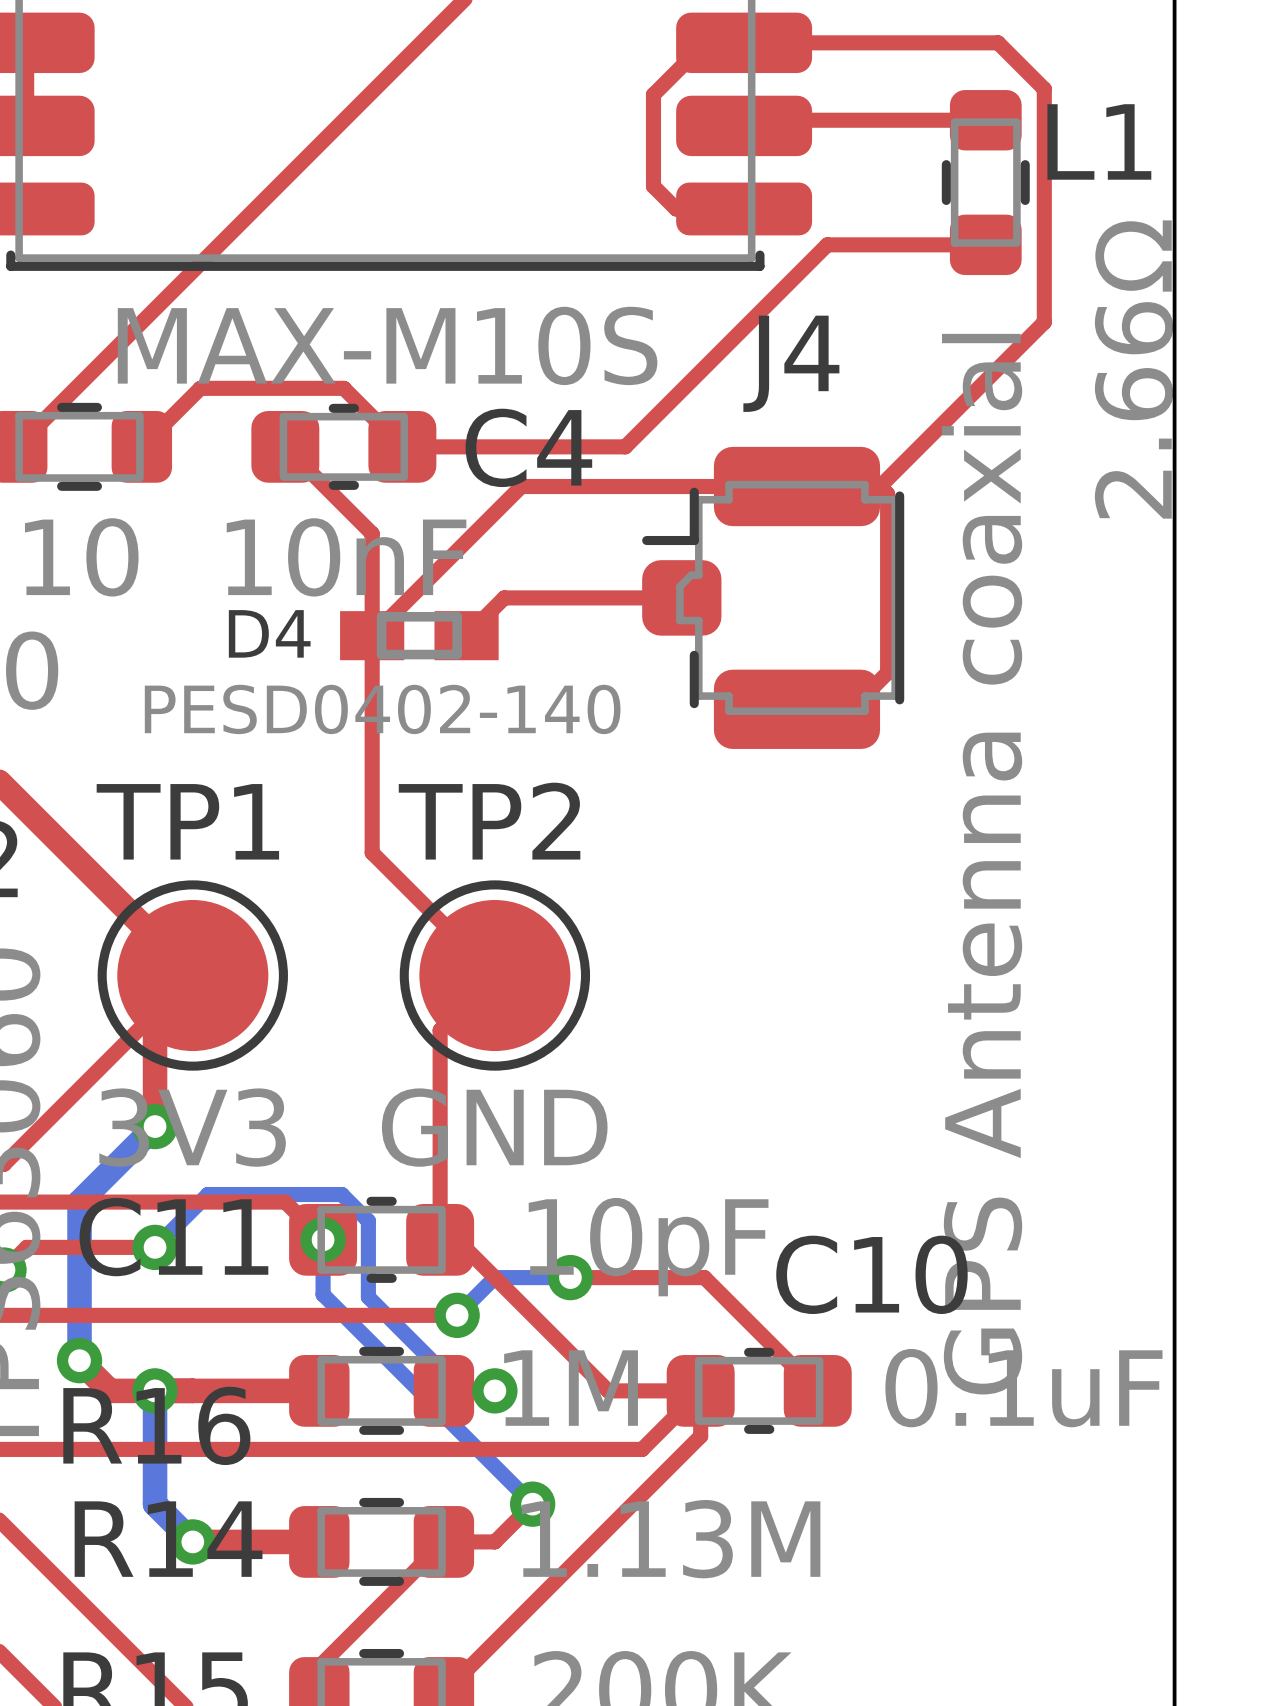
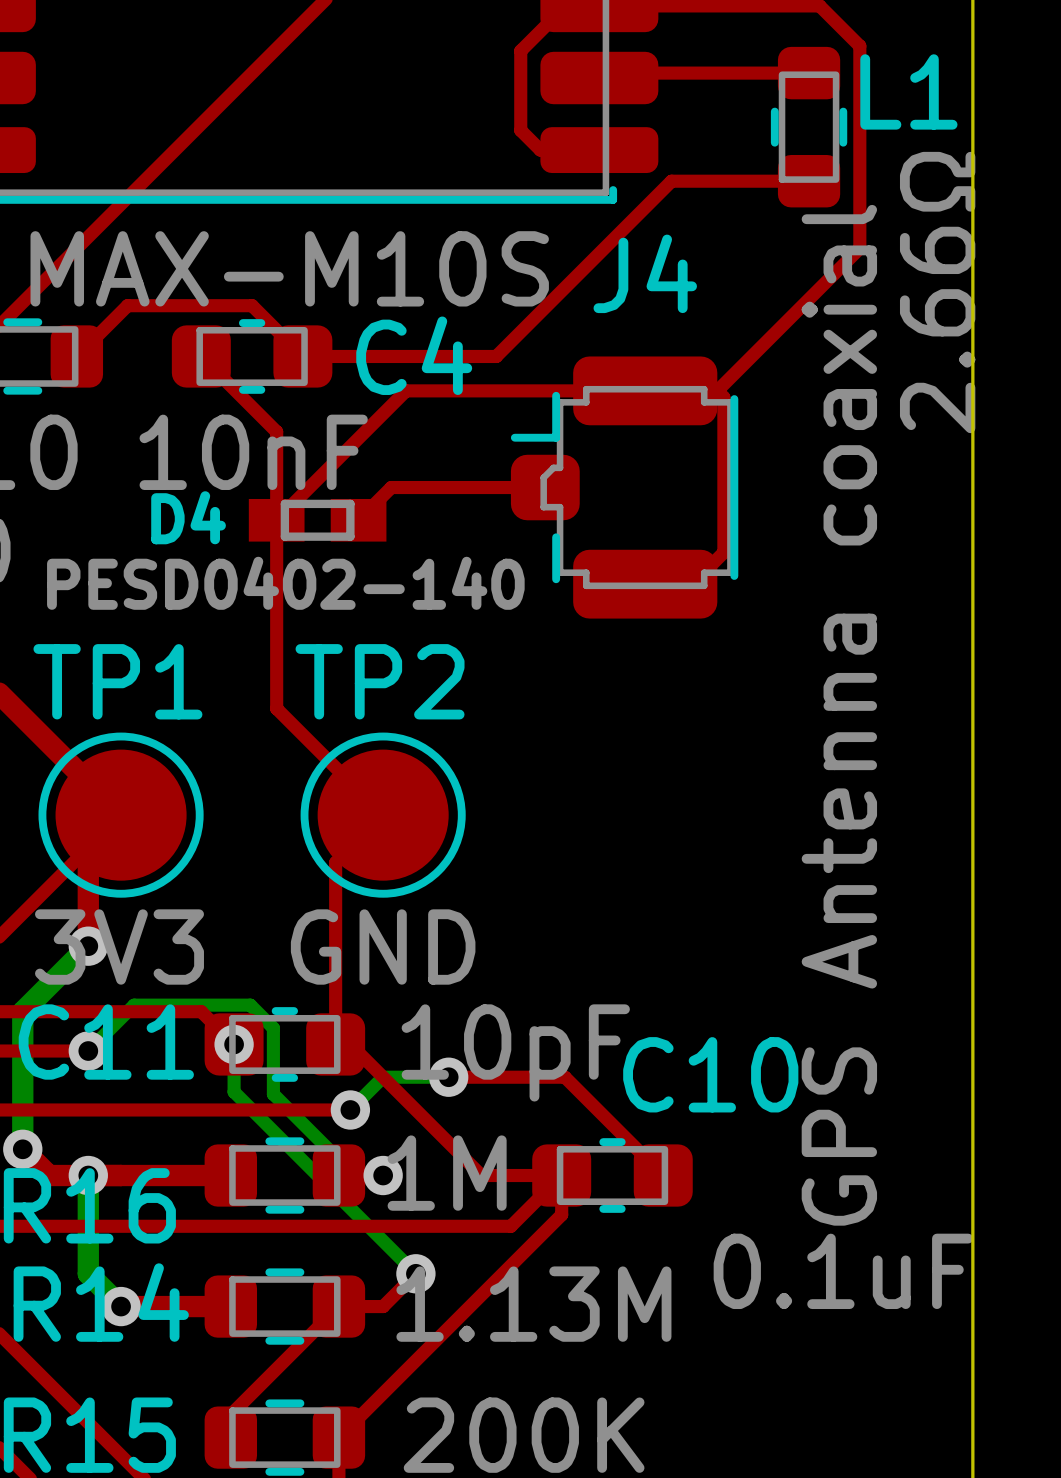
J4 value position: GPS Antenna coaxial (982, 864) -> GPS Antenna coaxial (839, 715)
C10 value position: 0.1uF (1023, 1388) -> 0.1uF (843, 1271)

